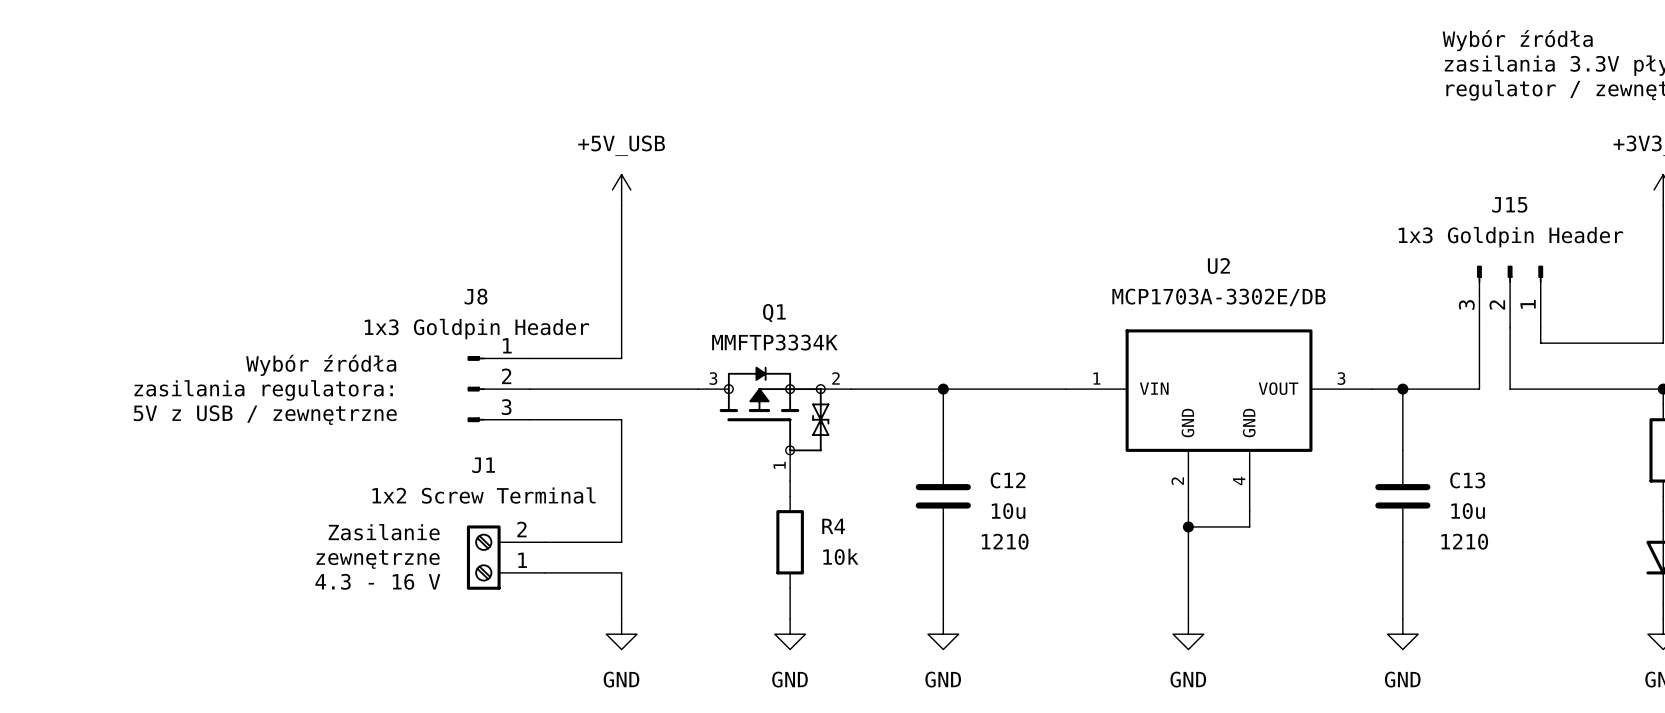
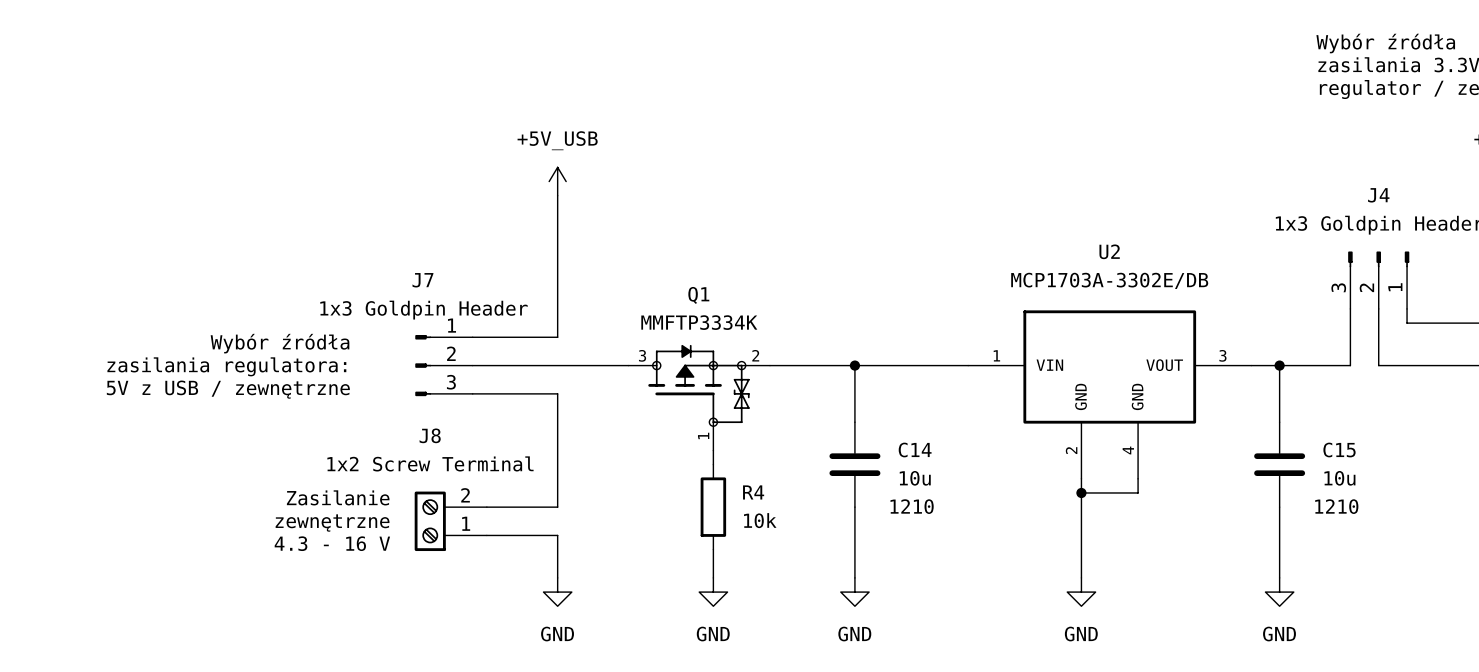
J15 name: J15 (1509, 204) -> J4 (1378, 195)
J8 name: J8 (475, 296) -> J7 (422, 280)
J1 name: J1 (483, 465) -> J8 (430, 435)
C12 name: C12 (1008, 480) -> C14 (915, 450)
C13 name: C13 (1467, 480) -> C15 (1339, 450)

